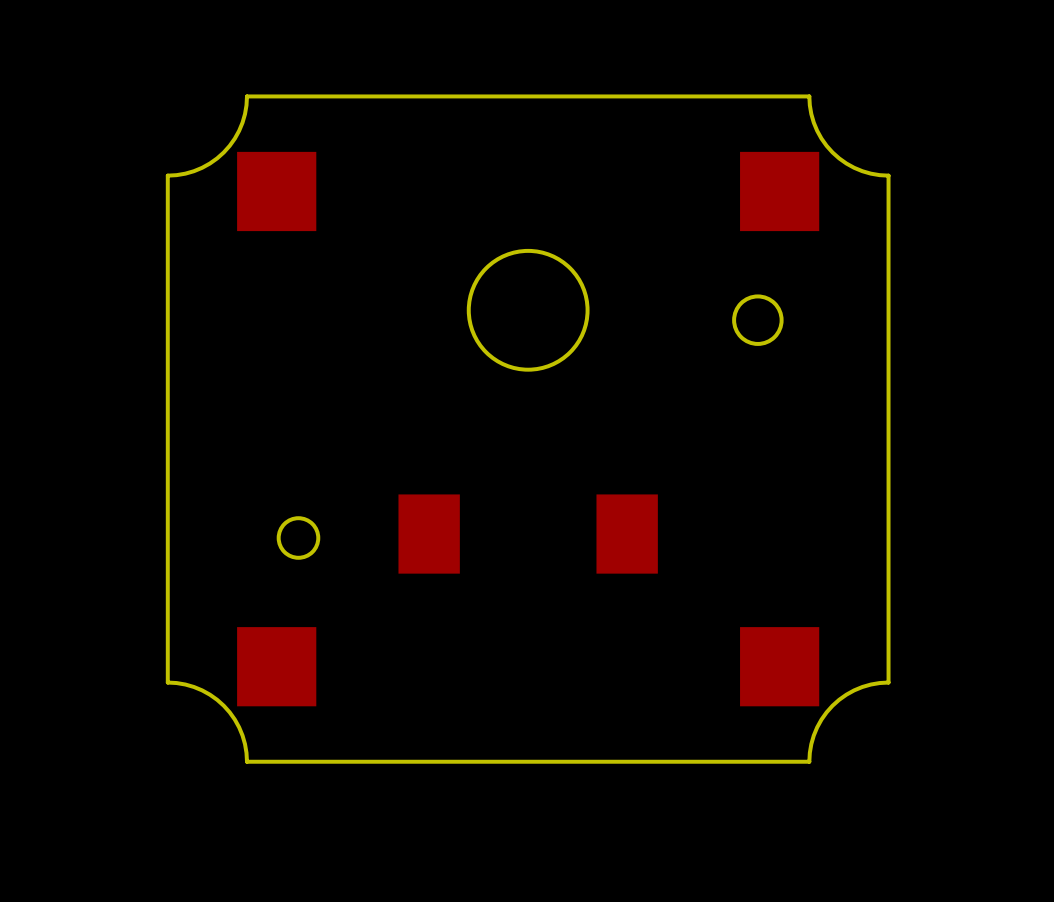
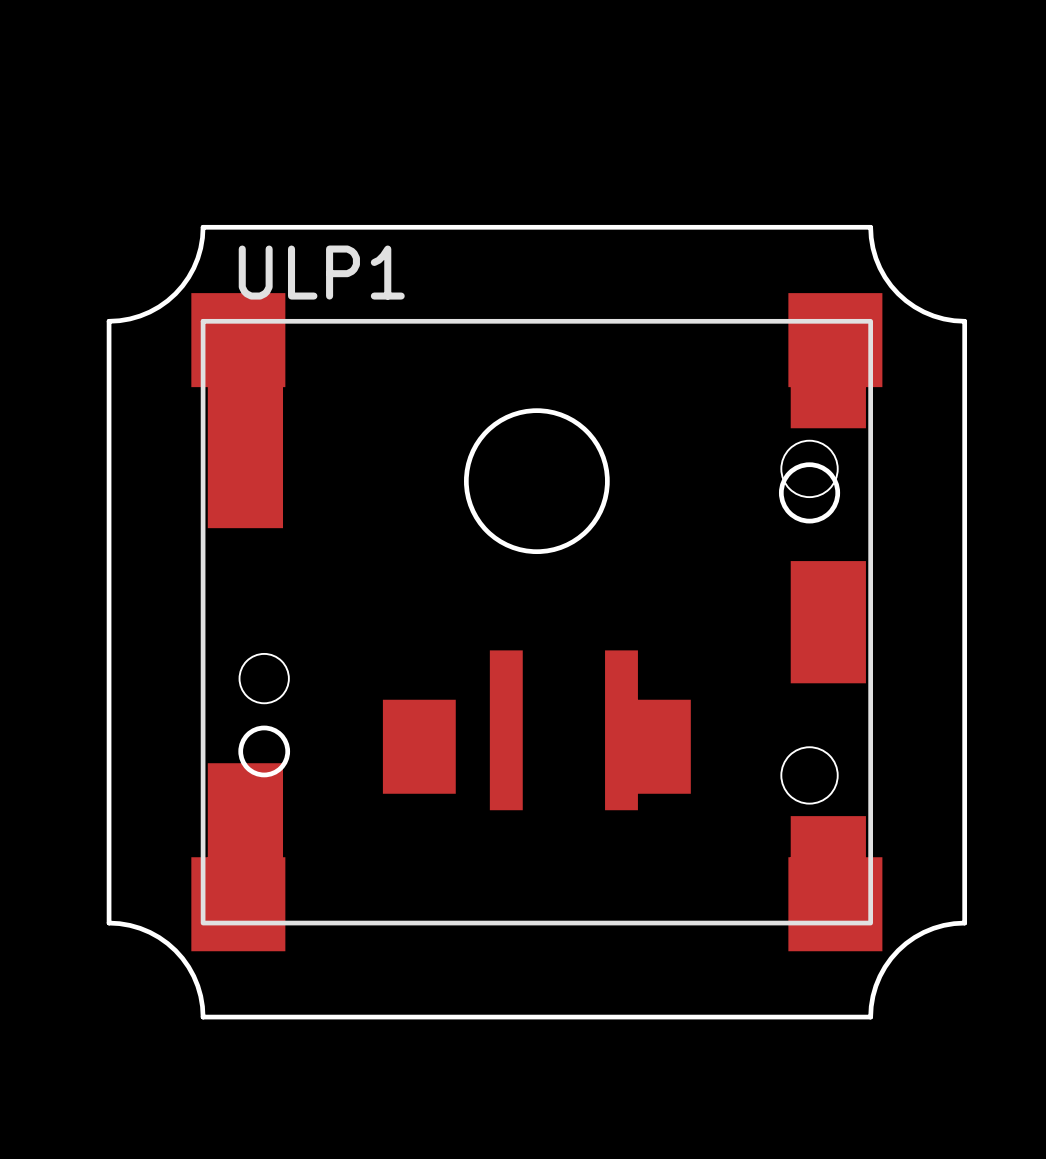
ULP1: none -> (536, 622)

